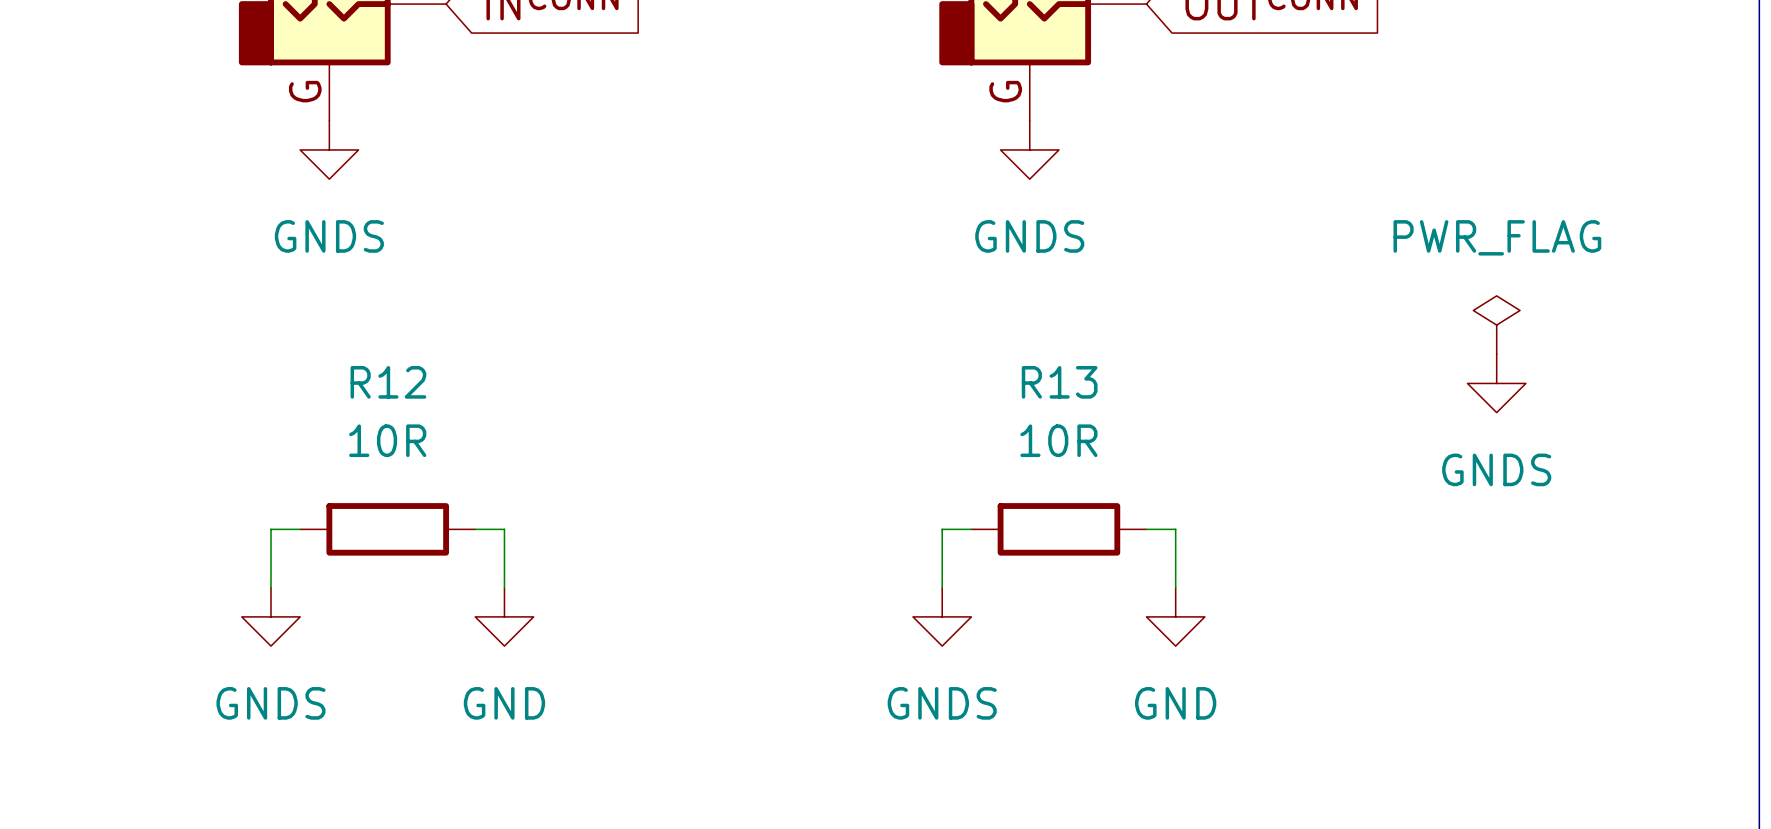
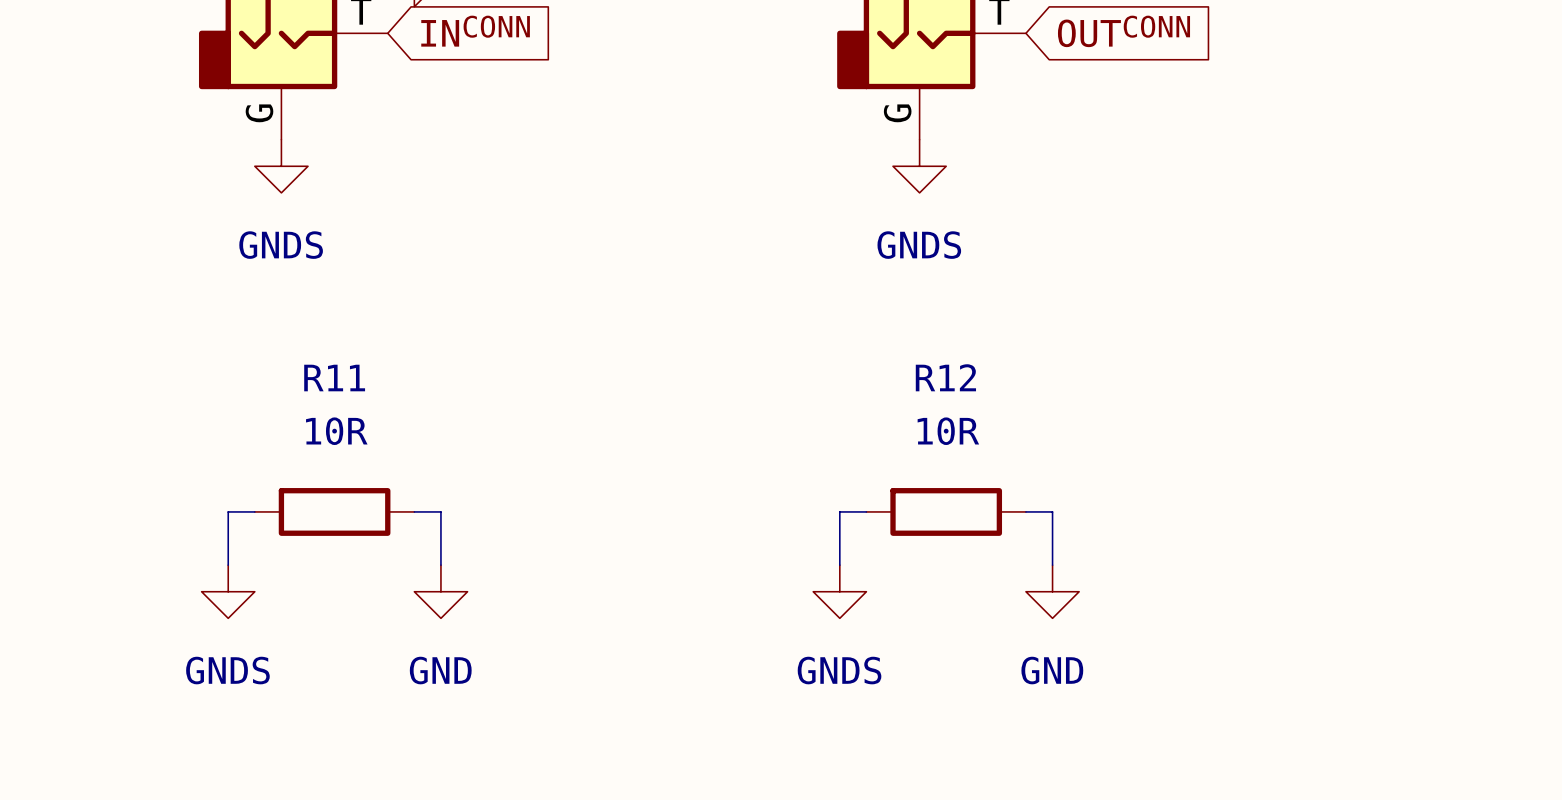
power symbol: PWR_FLAG (1496, 325) -> none
R12 name: R12 (388, 382) -> R11 (334, 378)
R13 name: R13 (1059, 382) -> R12 (945, 377)
power symbol: GNDS (1496, 383) -> none

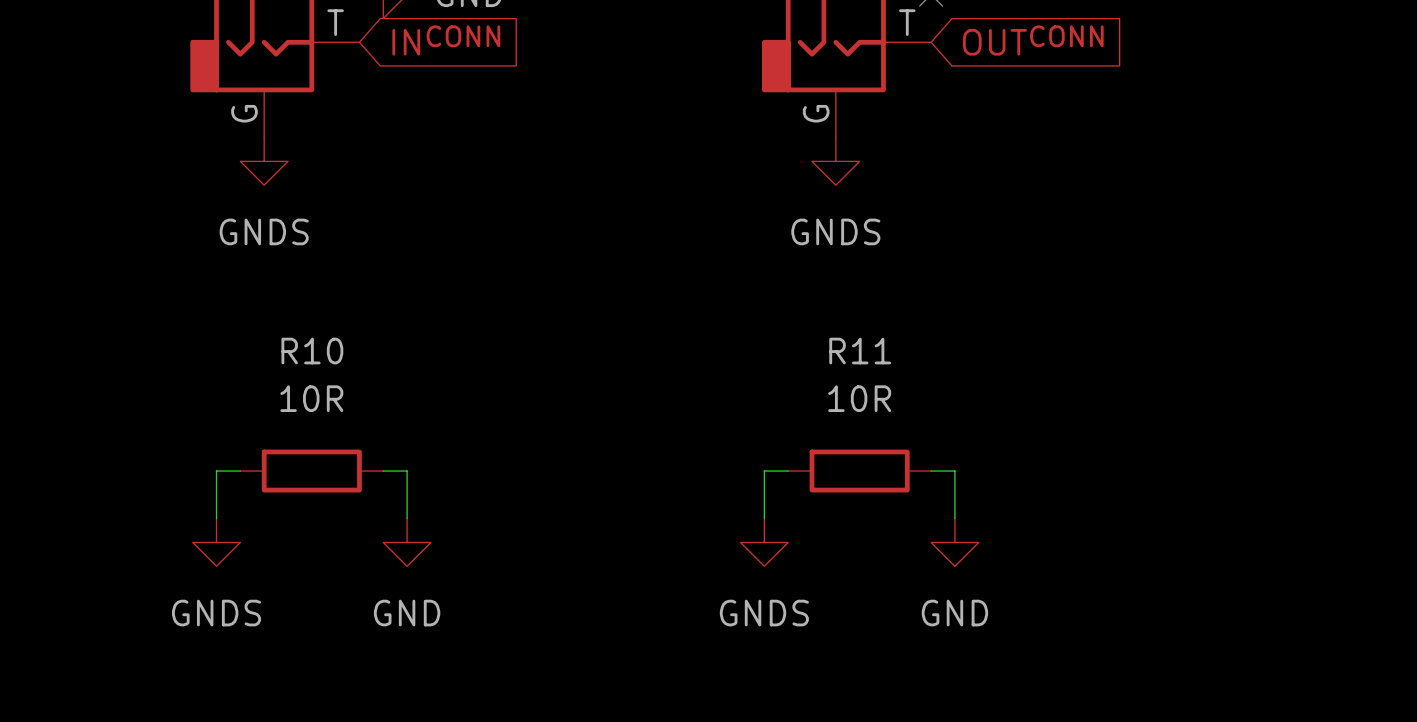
R12 name: R12 (945, 377) -> R11 (860, 351)
R11 name: R11 (334, 378) -> R10 (312, 351)

